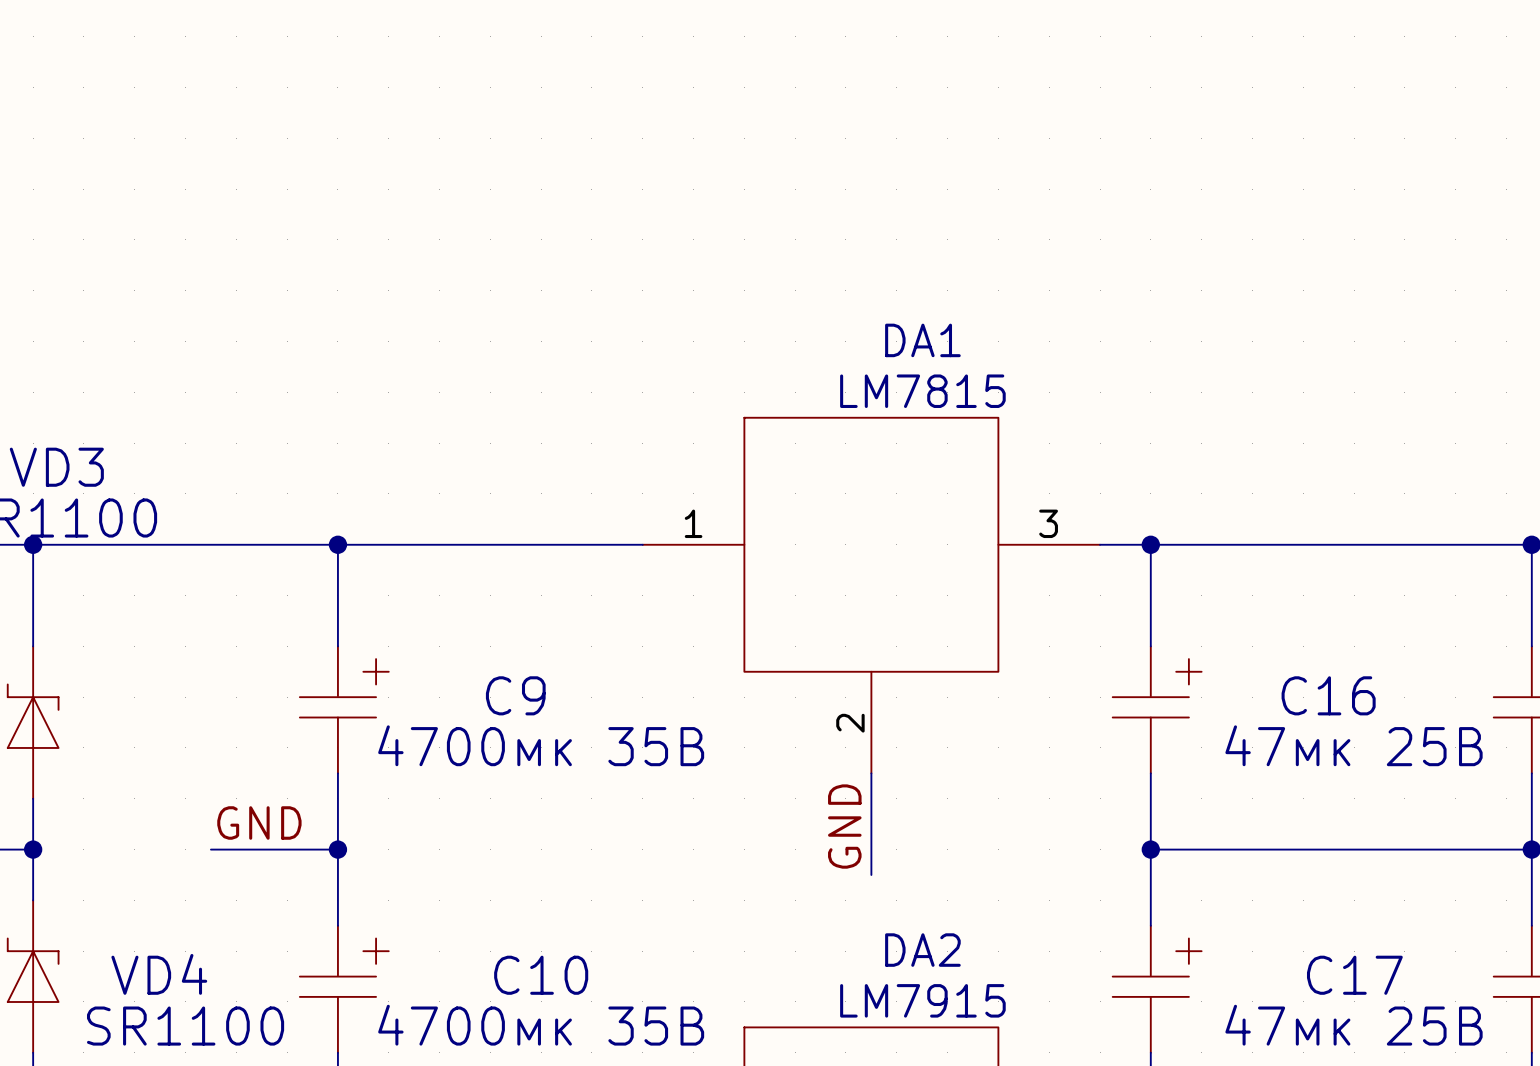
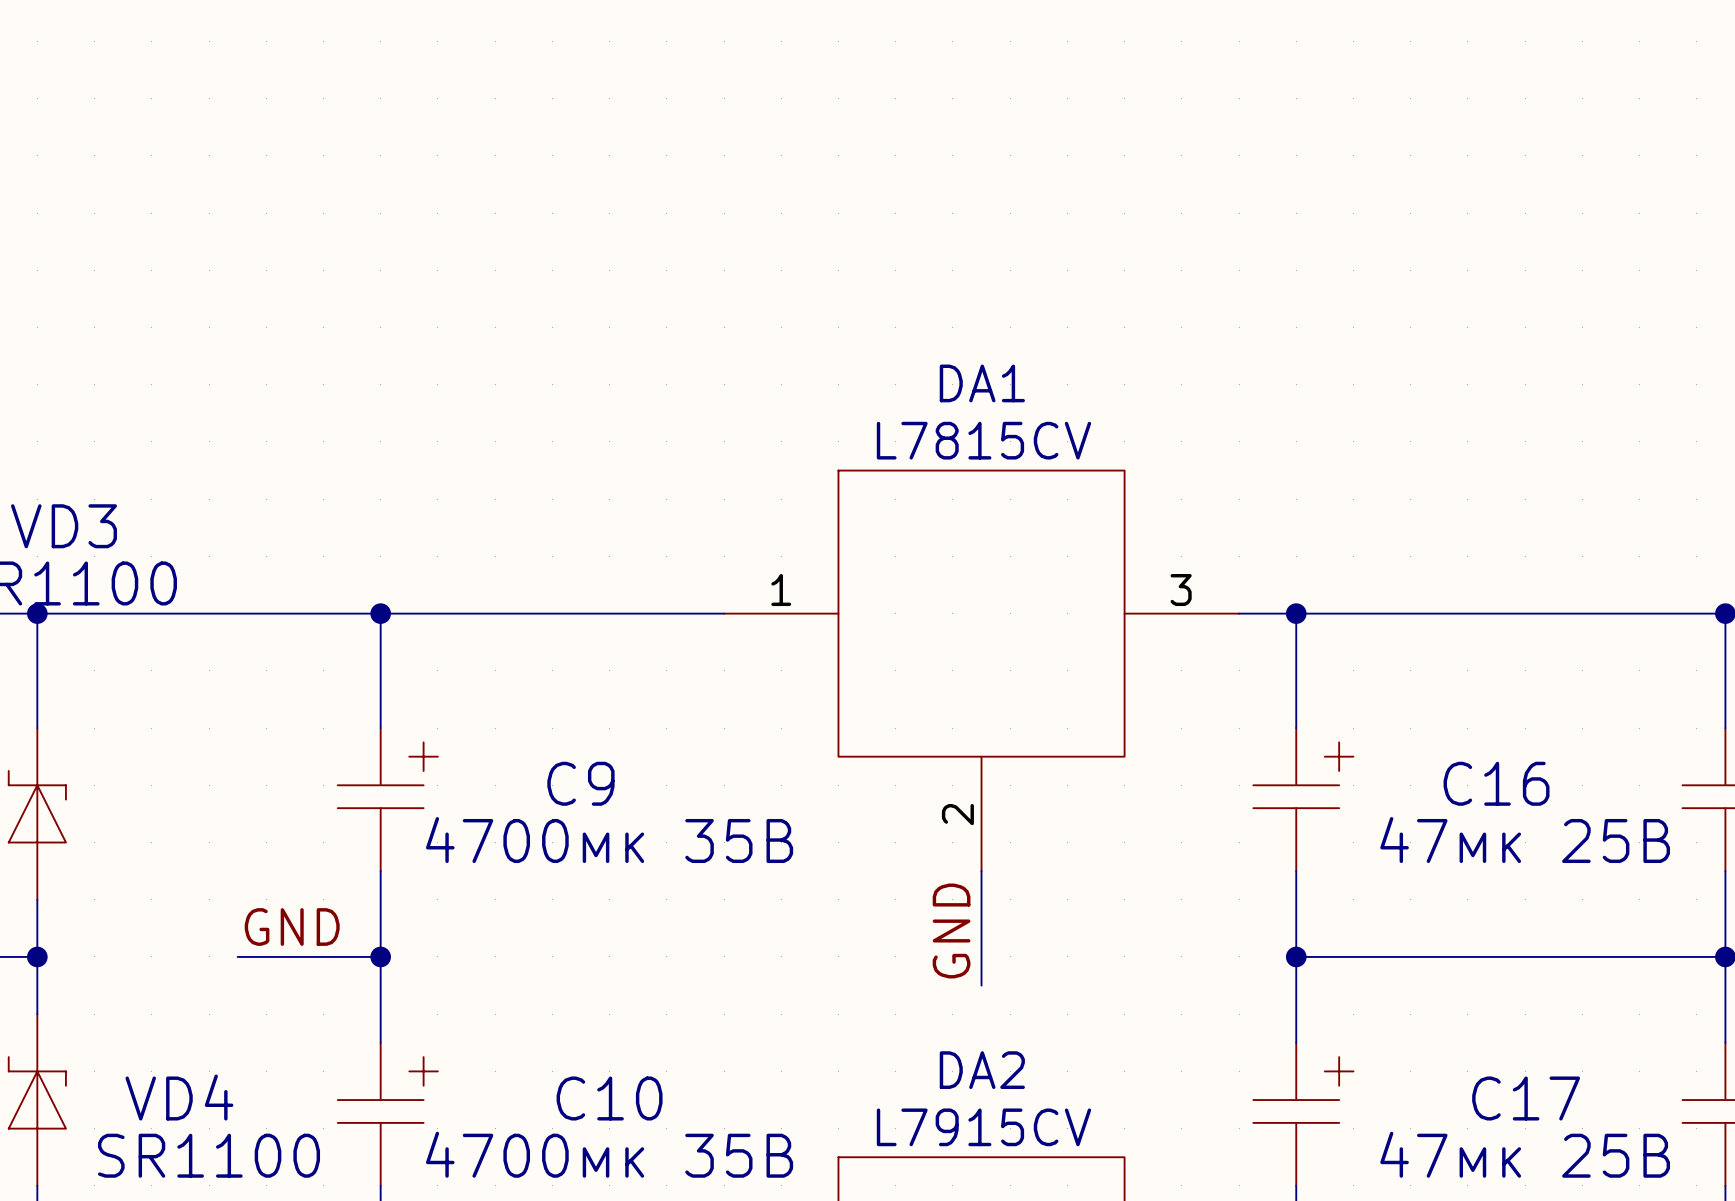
DA1 name position: DA1 (922, 340) -> DA1 (982, 383)
DA1 value: LM7815 (922, 391) -> L7815CV (983, 440)
DA2 name position: DA2 (922, 950) -> DA2 (982, 1070)
DA2 value: LM7915 (922, 1000) -> L7915CV (983, 1127)

